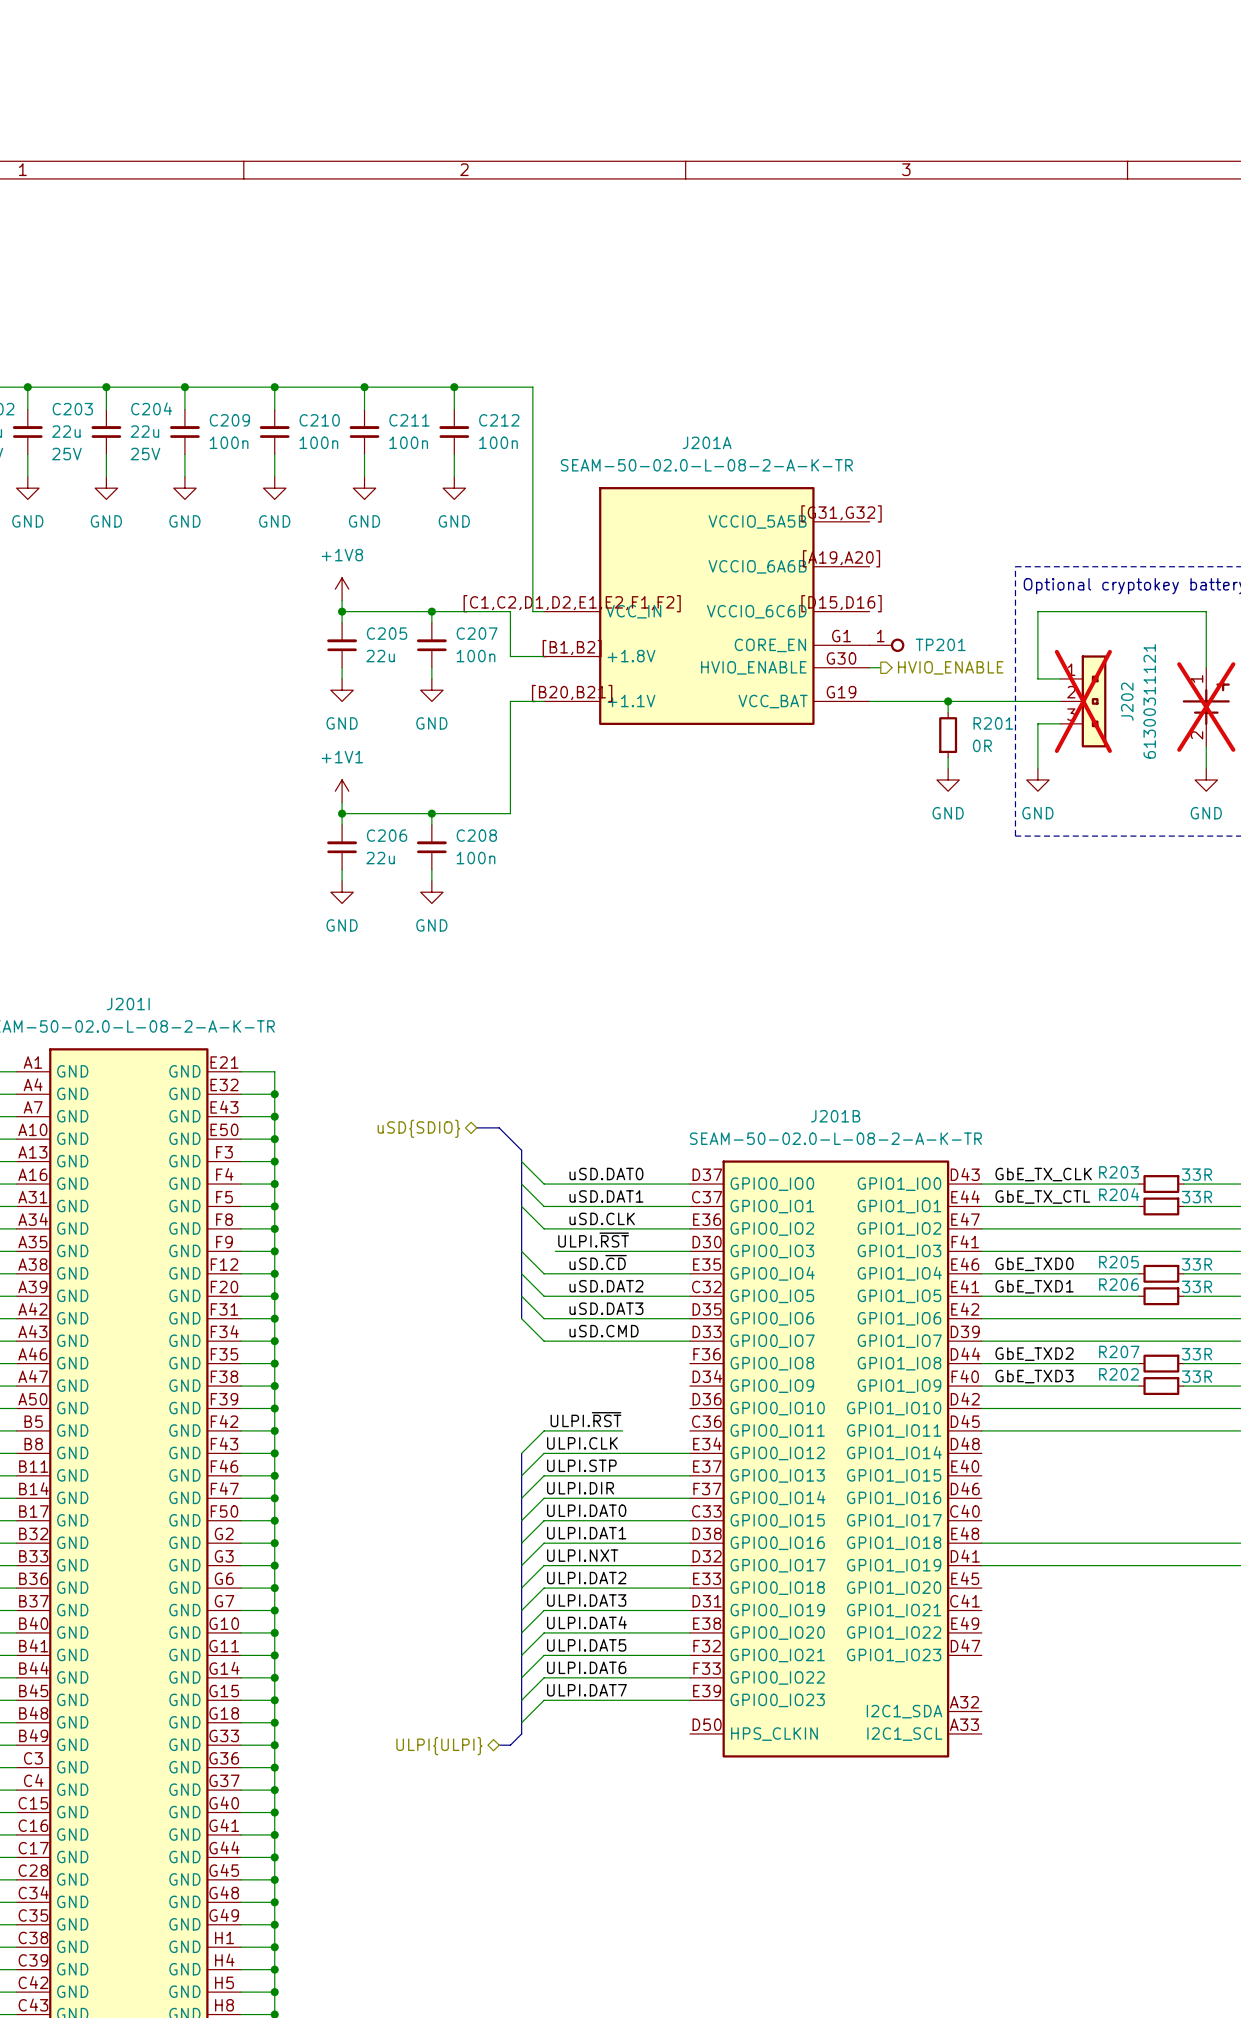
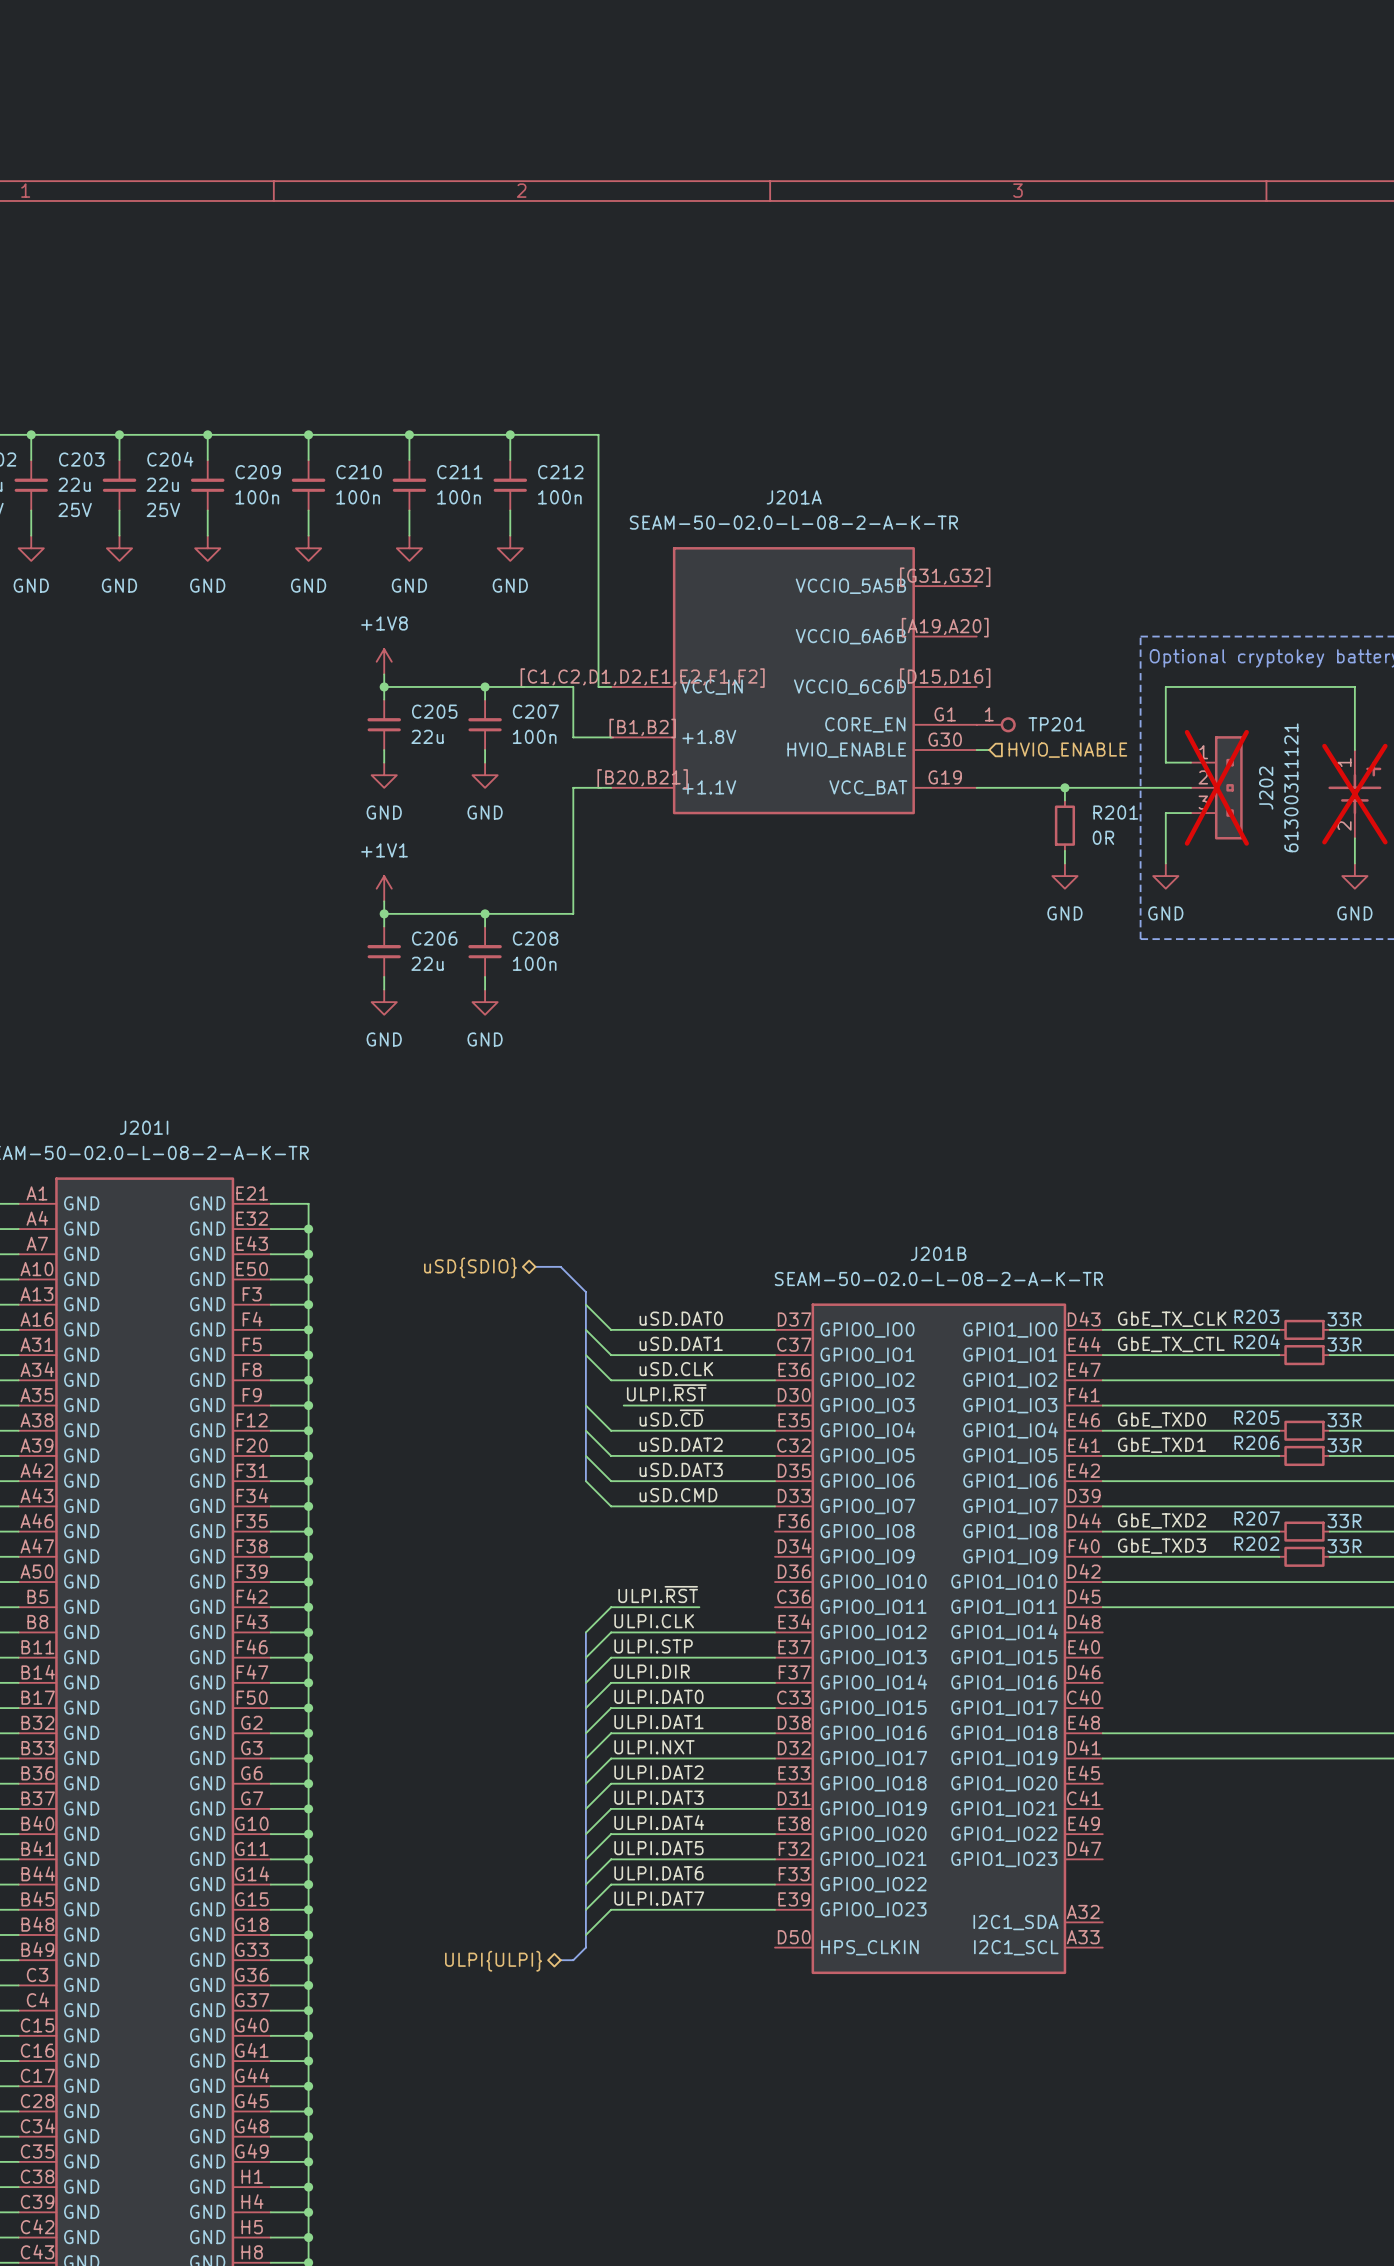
hierarchical label shape: output (950, 667) -> input (1067, 750)

